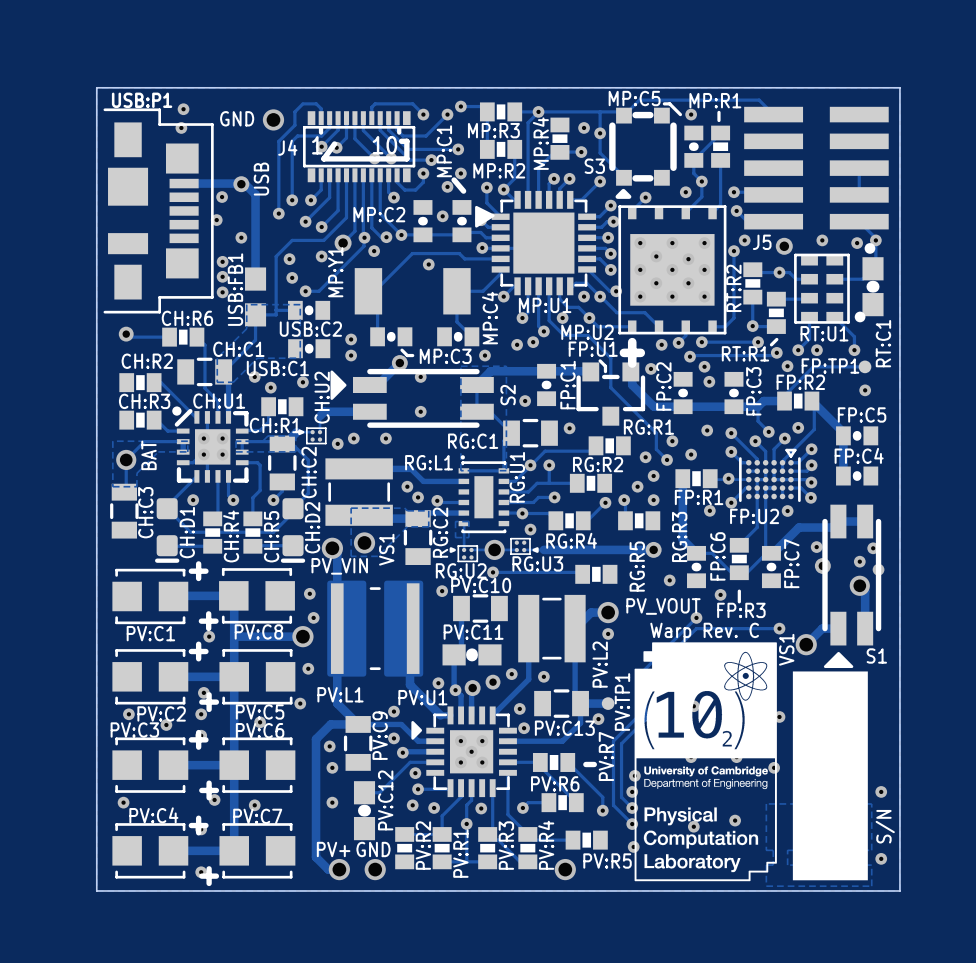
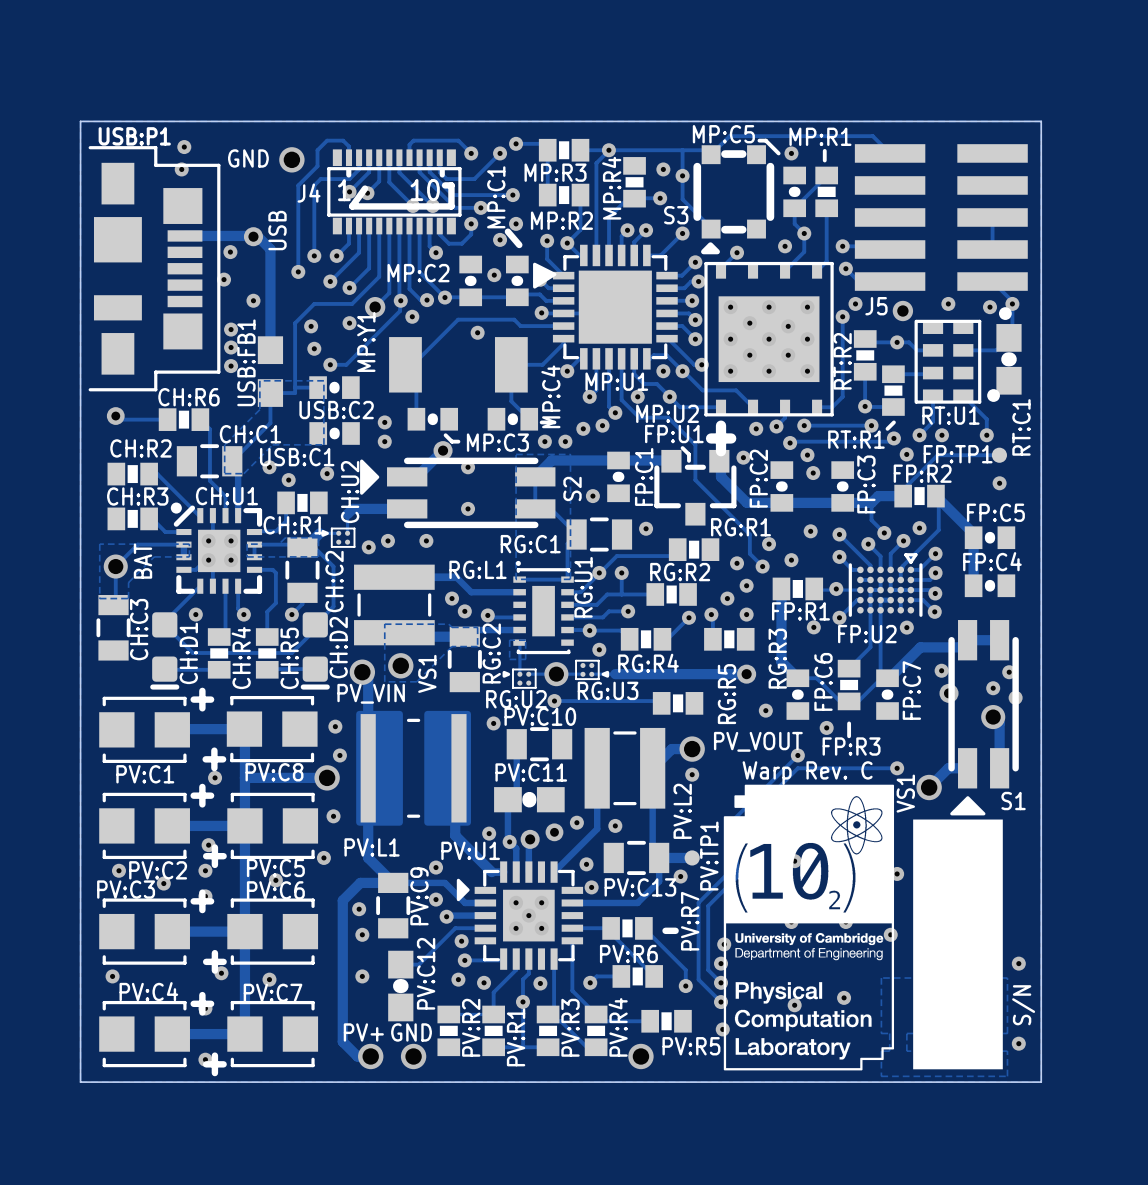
line: none -> (541, 422) (554, 422)
via: none -> (565, 441)

